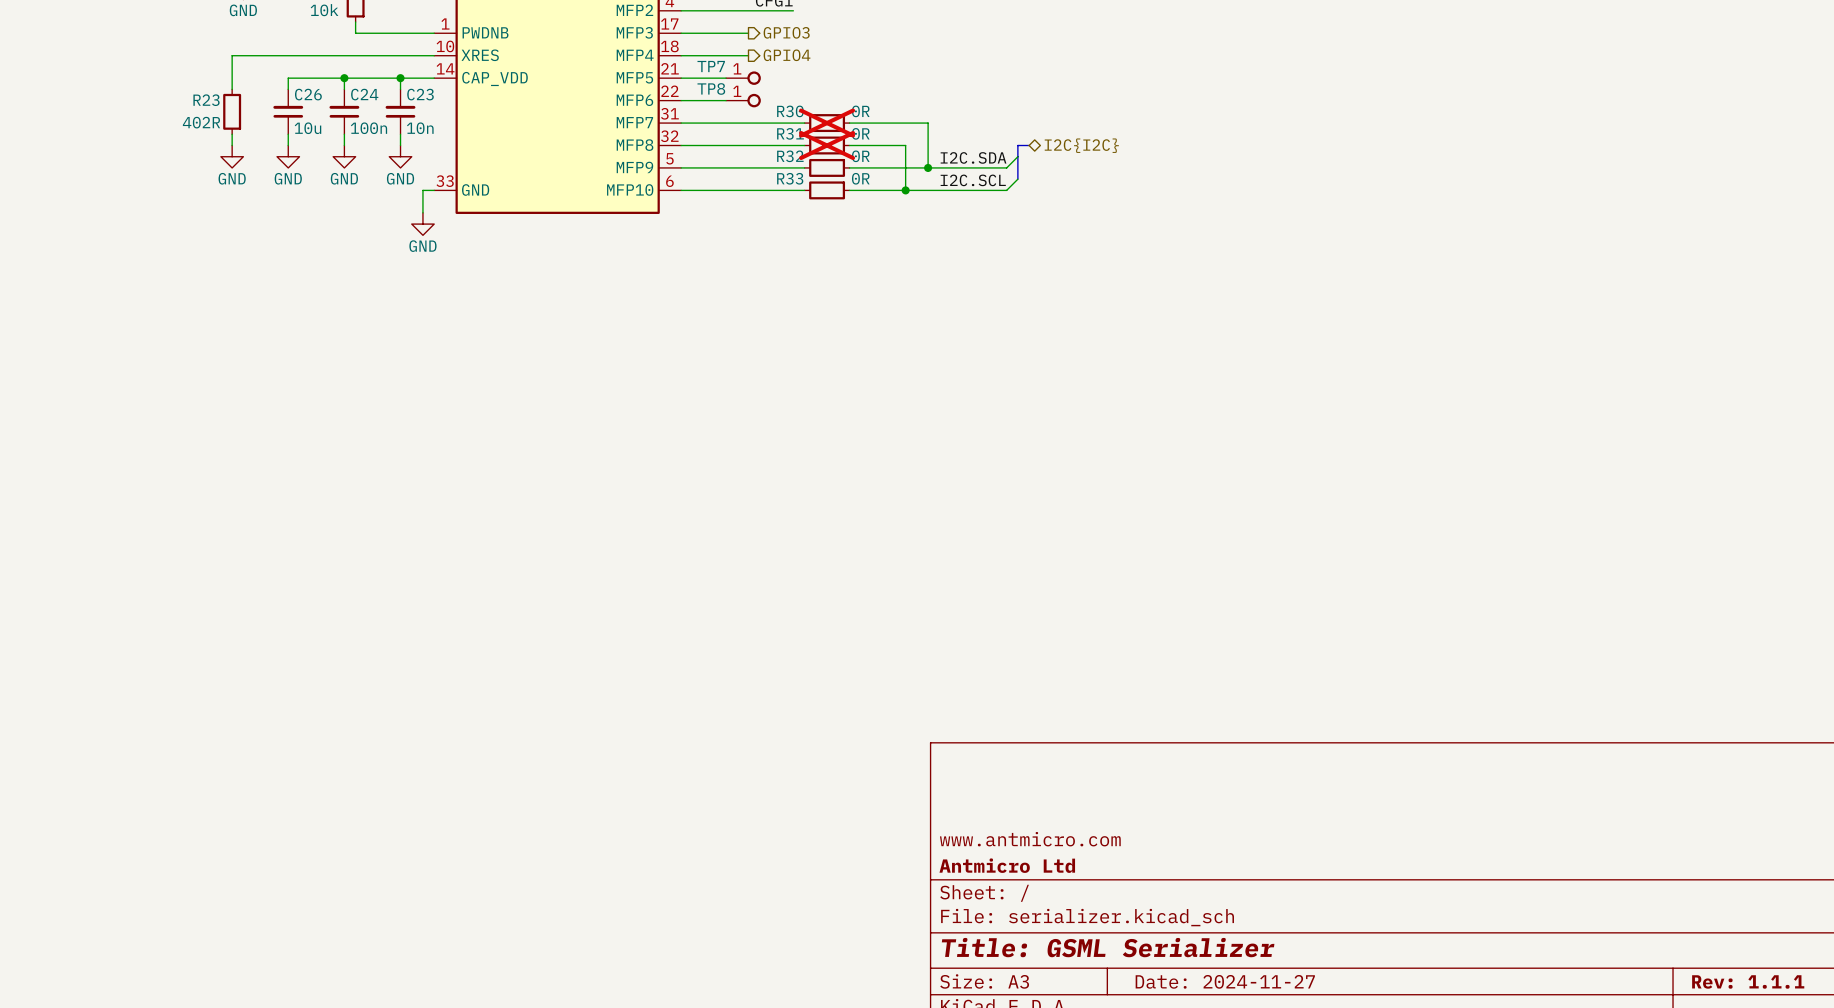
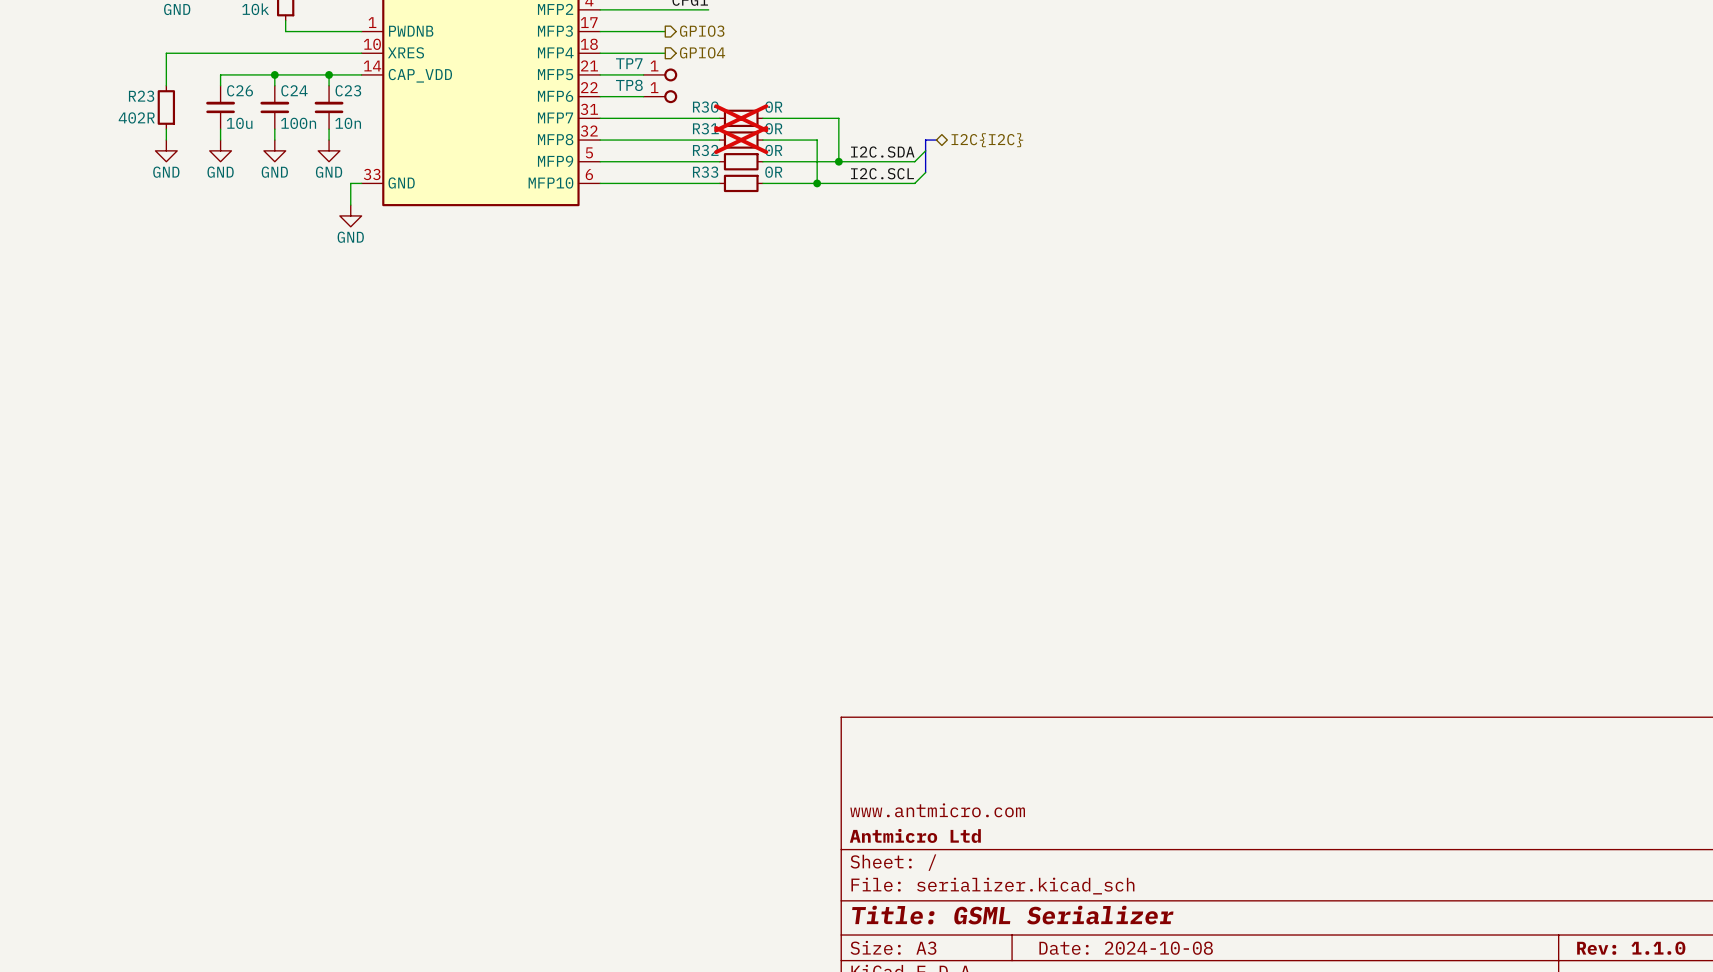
title block: Date: 2024-11-27 (1225, 981) -> Date: 2024-10-08 (1126, 948)
title block: Rev: 1.1.1 (1748, 981) -> Rev: 1.1.0 (1631, 948)

